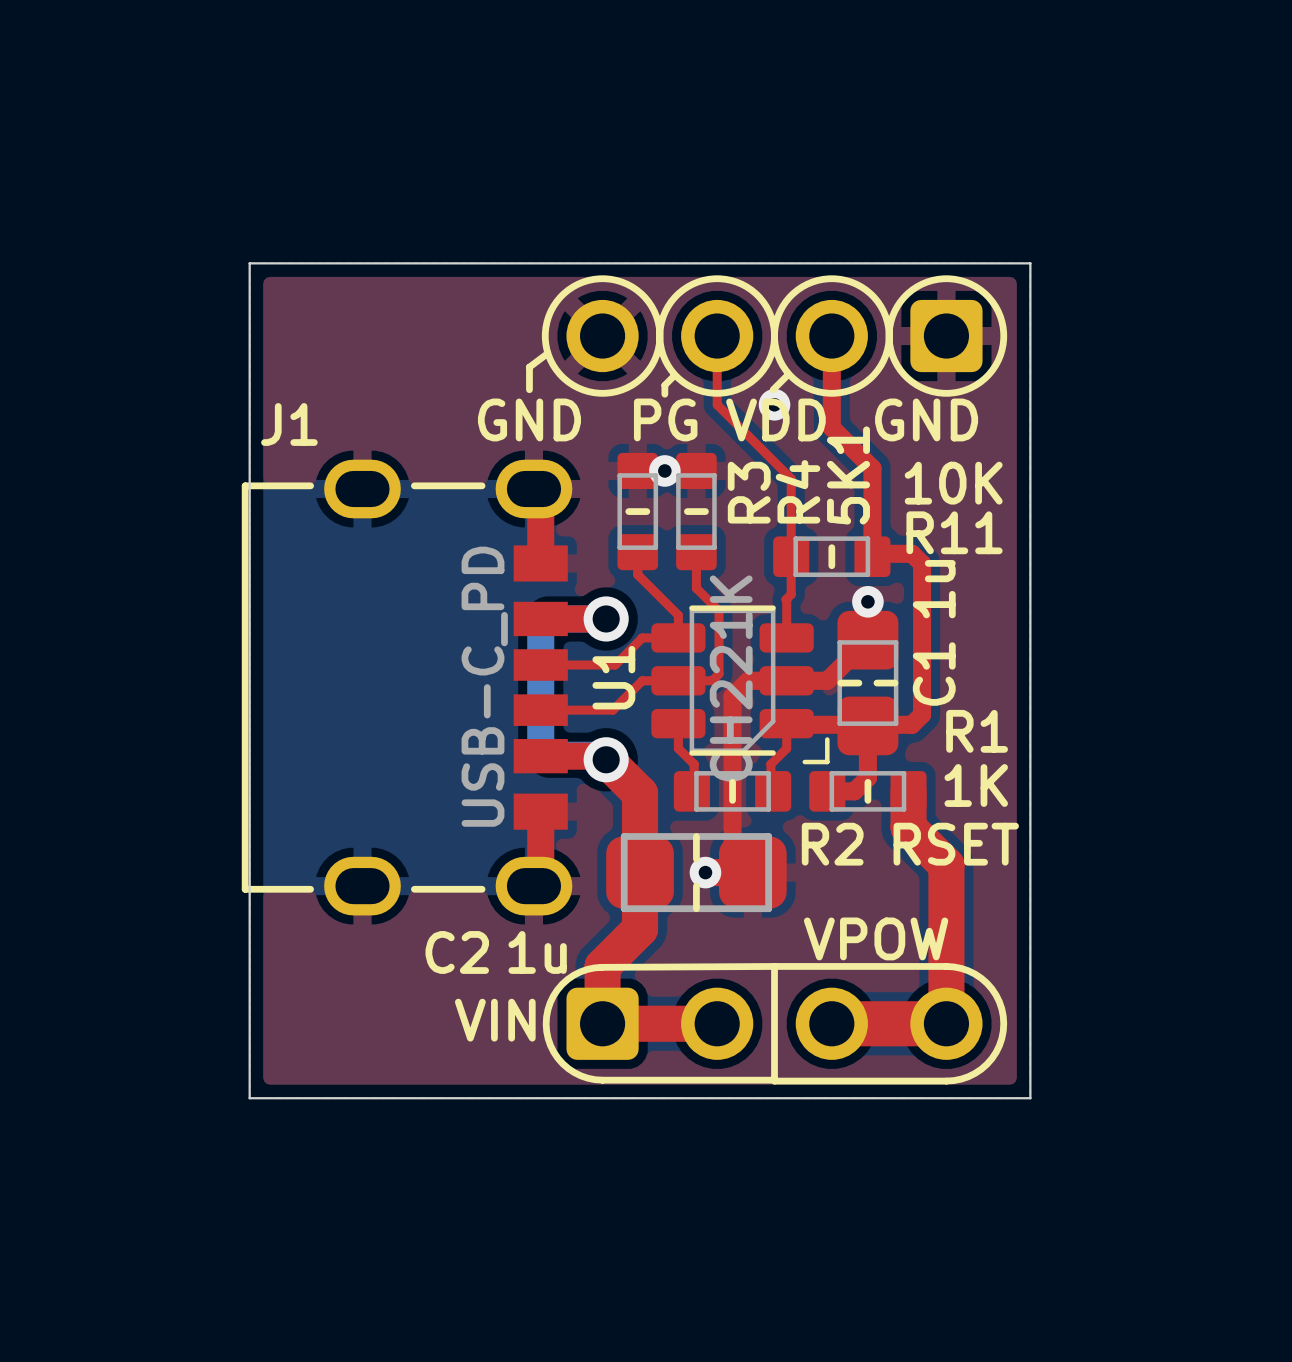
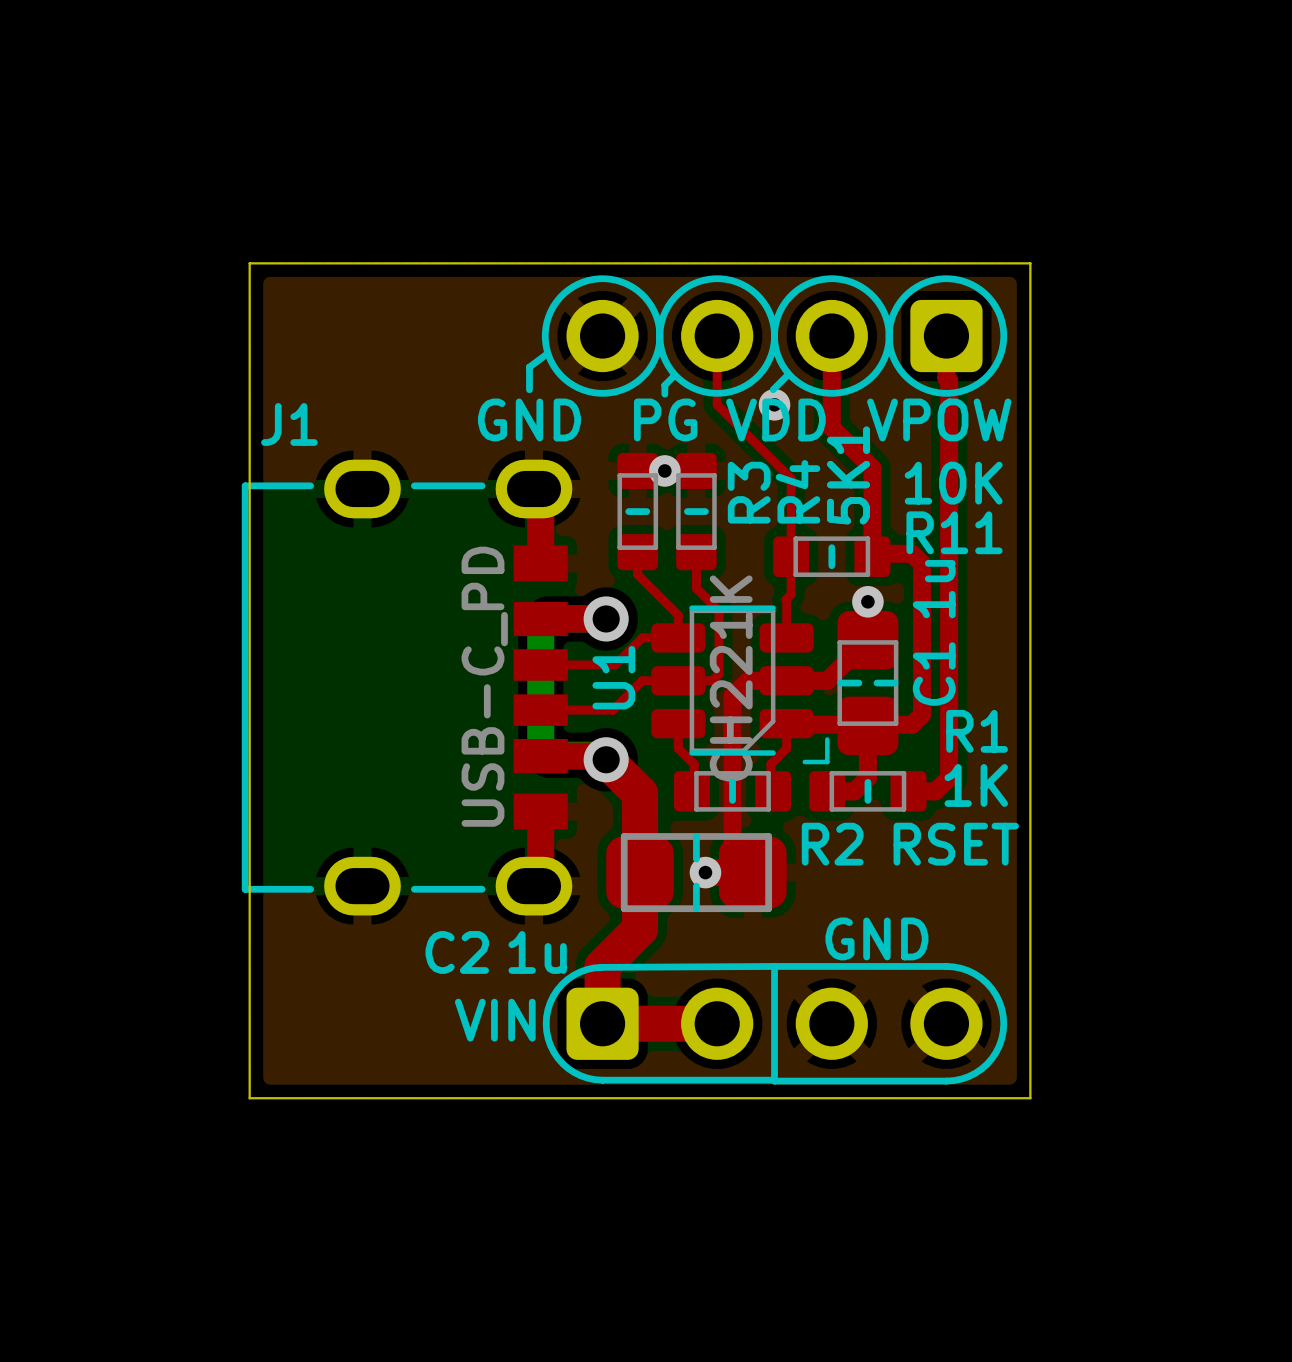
text: GND (926, 419) -> VPOW (939, 419)
top track: (908, 791) (908, 827) (946, 865) (946, 1023) (831, 1023) -> (908, 791) (935, 791) (949, 777) (949, 380) (946, 377) (946, 336)
text: VPOW (876, 938) -> GND (876, 938)

